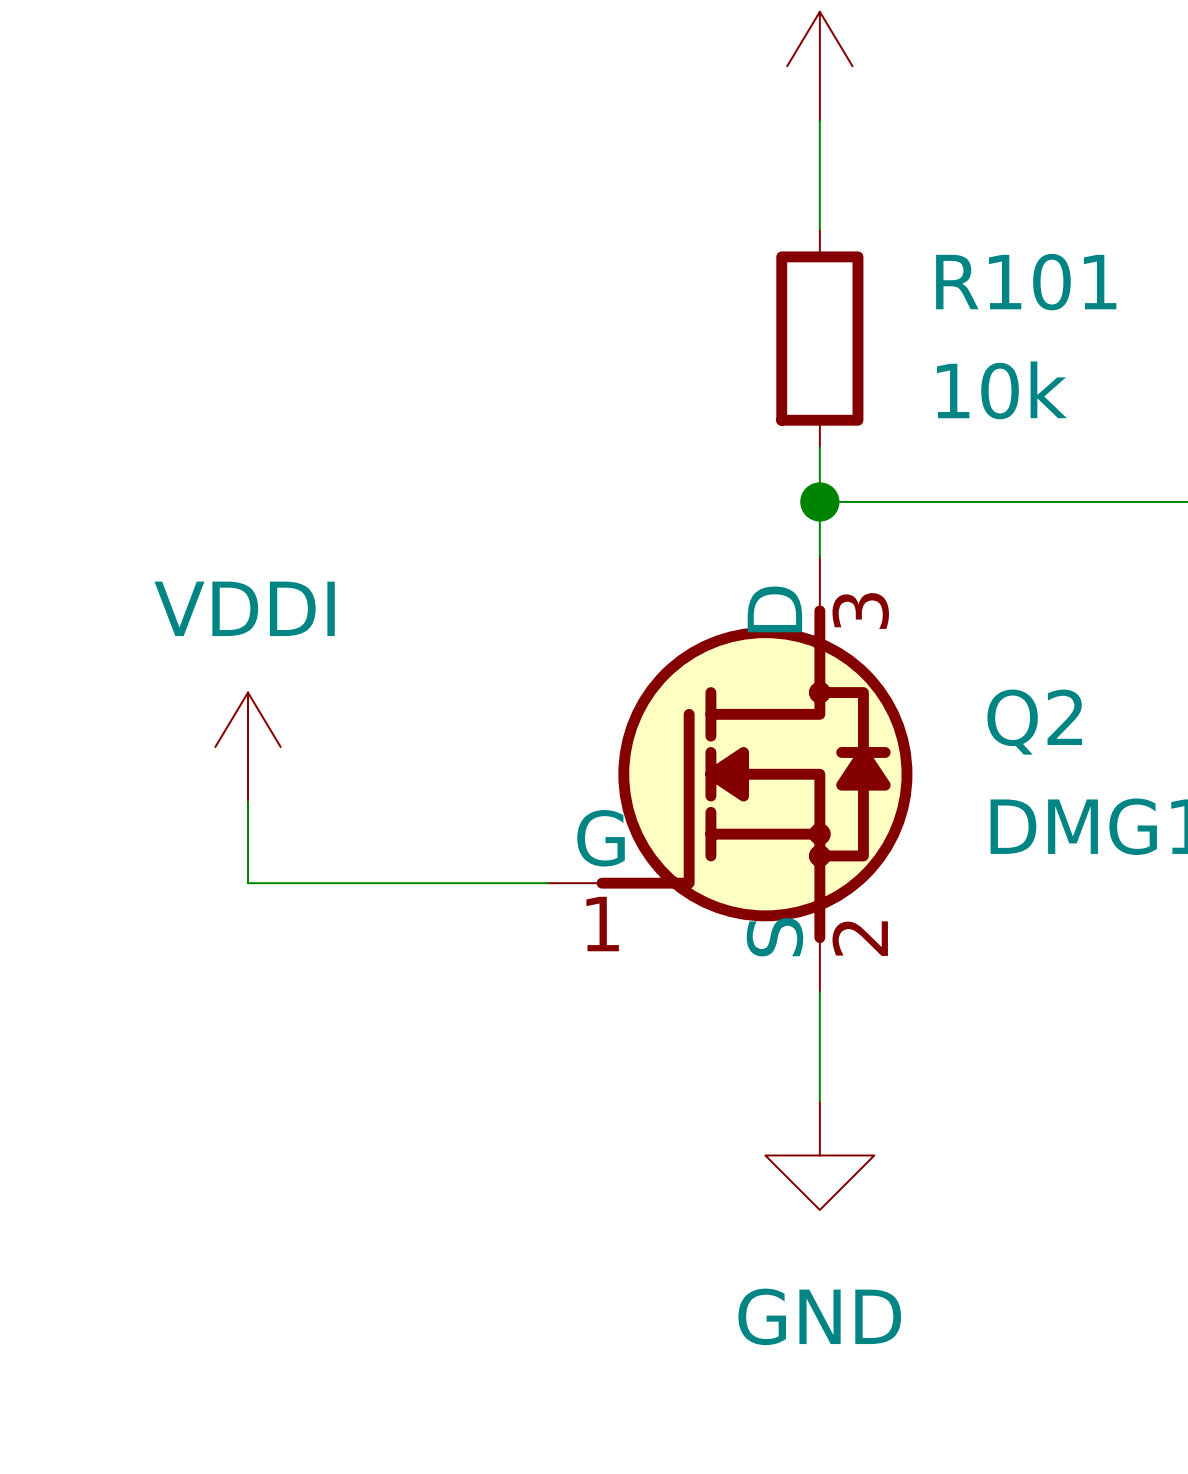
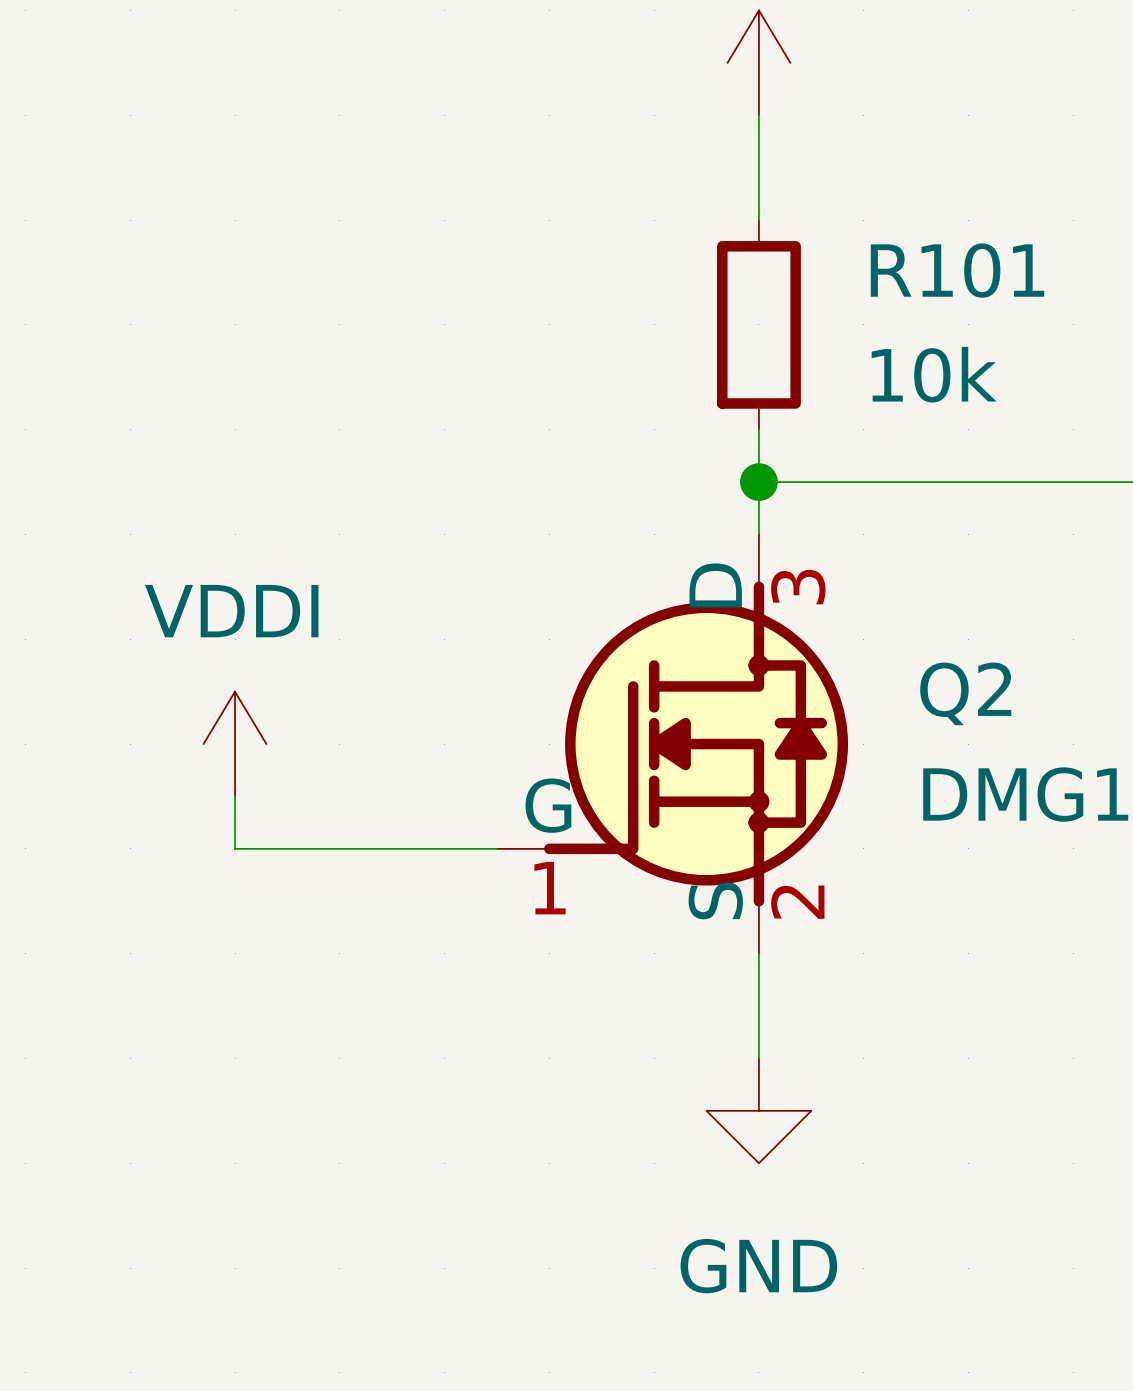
power symbol position: VDDI (248, 747) -> VDDI (235, 744)
wire: (248, 801) (248, 883) (275, 883) -> (235, 796) (235, 848)

